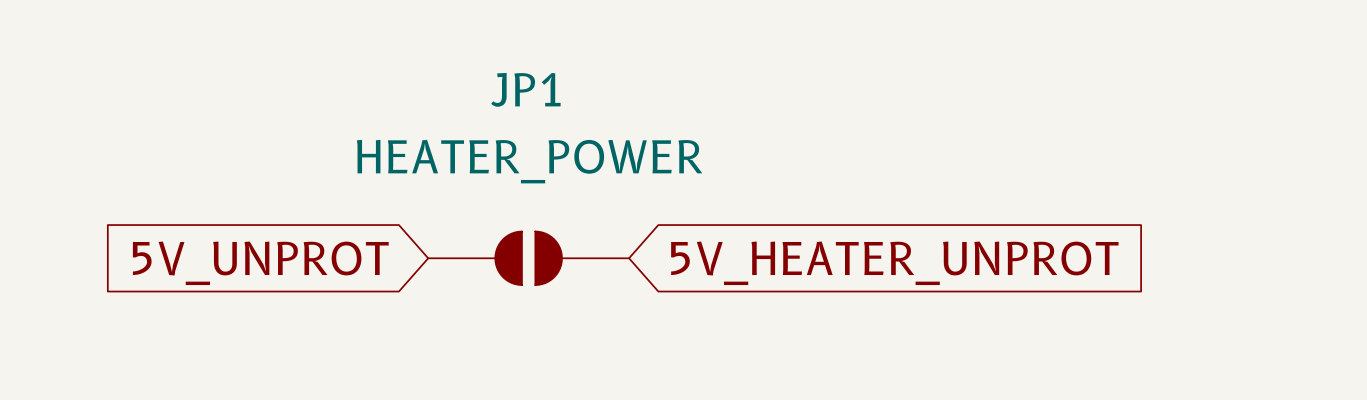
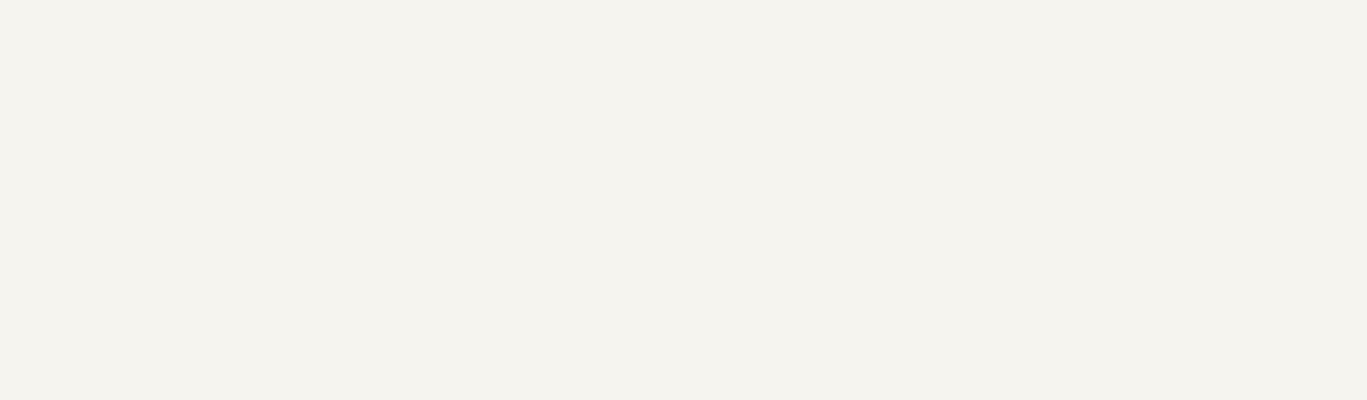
JP1: HEATER_POWER (528, 258) -> none
global label: 5V_UNPROT (260, 263) -> none
global label: 5V_HEATER_UNPROT (894, 263) -> none

